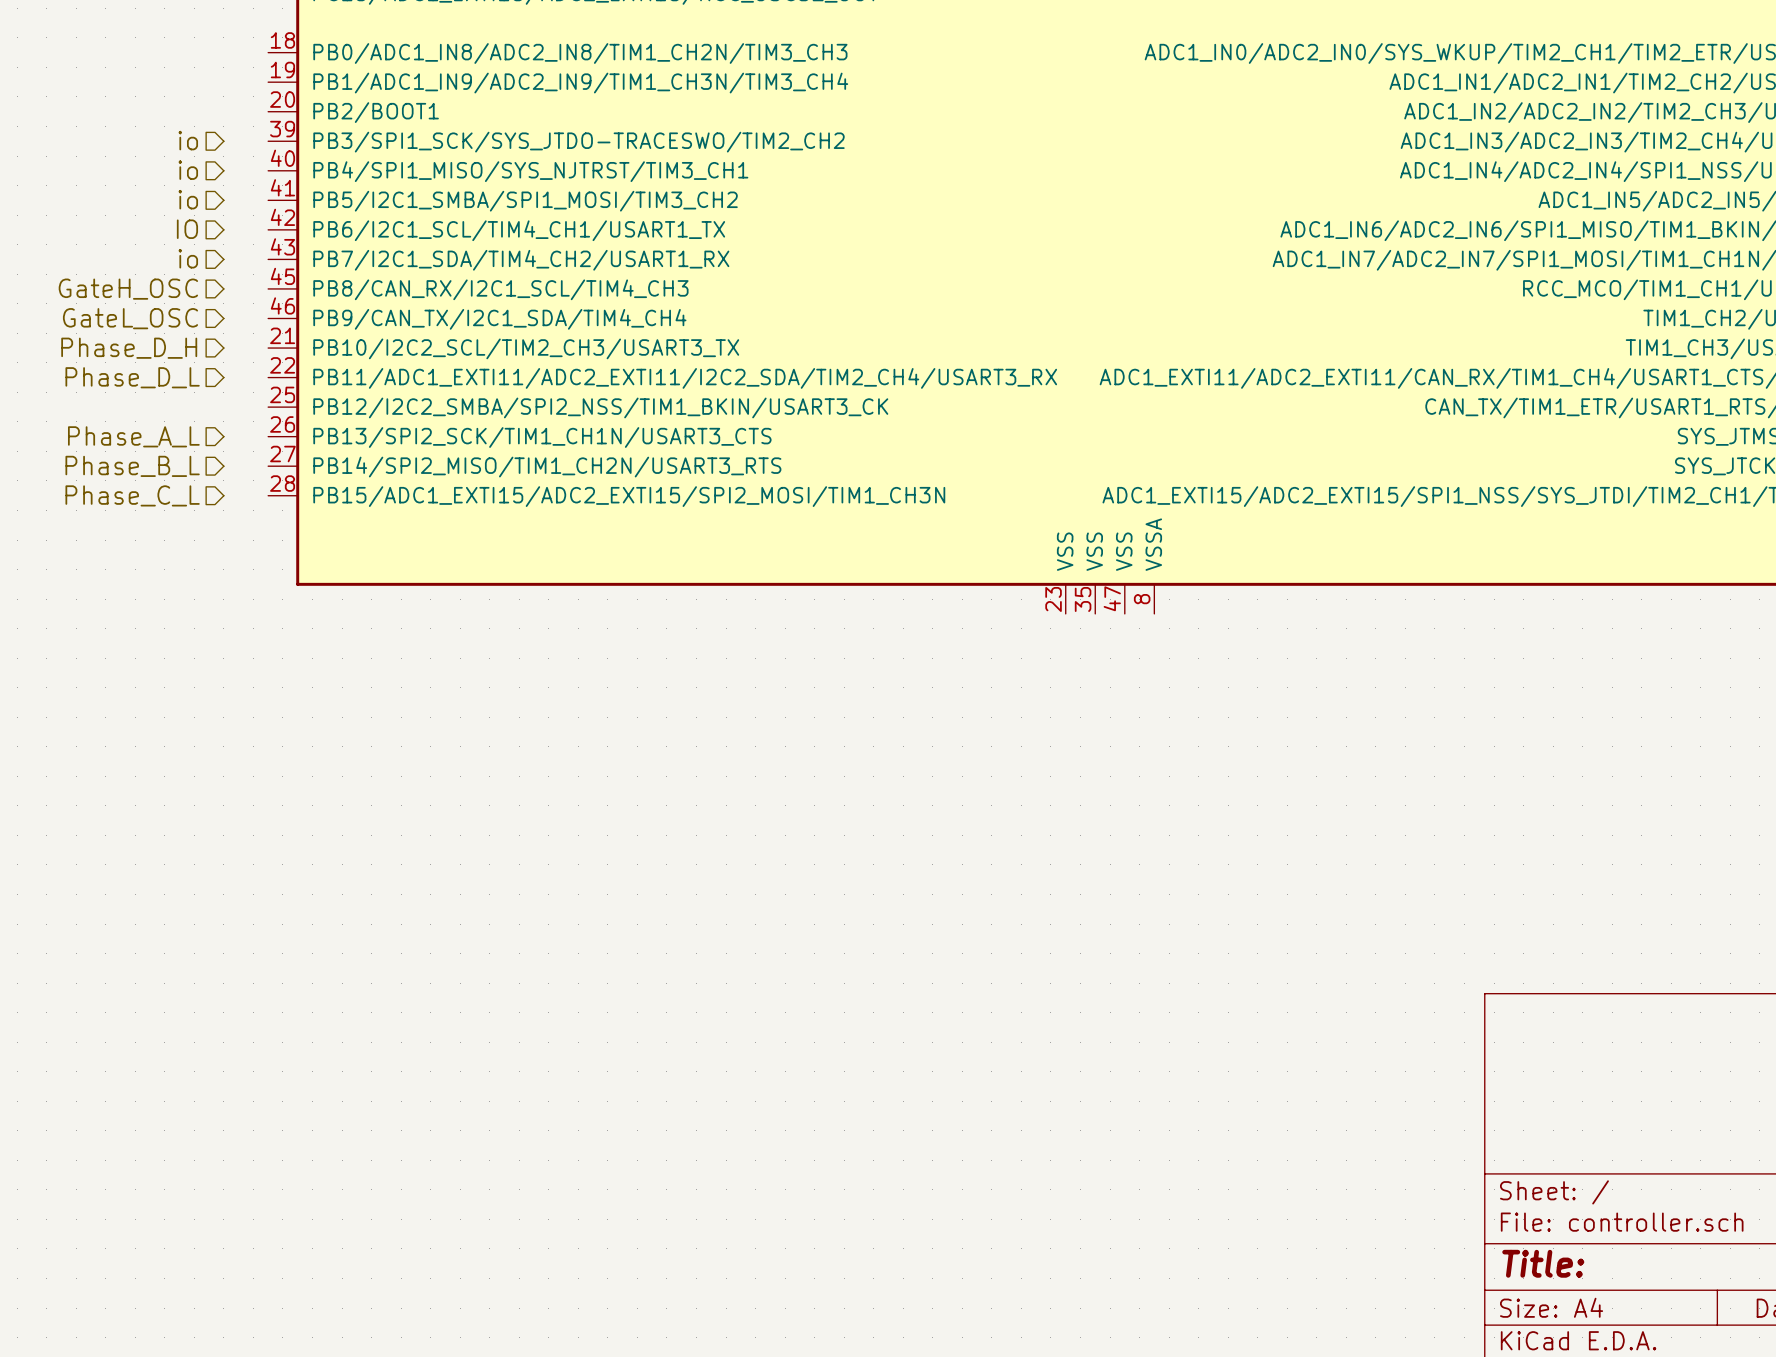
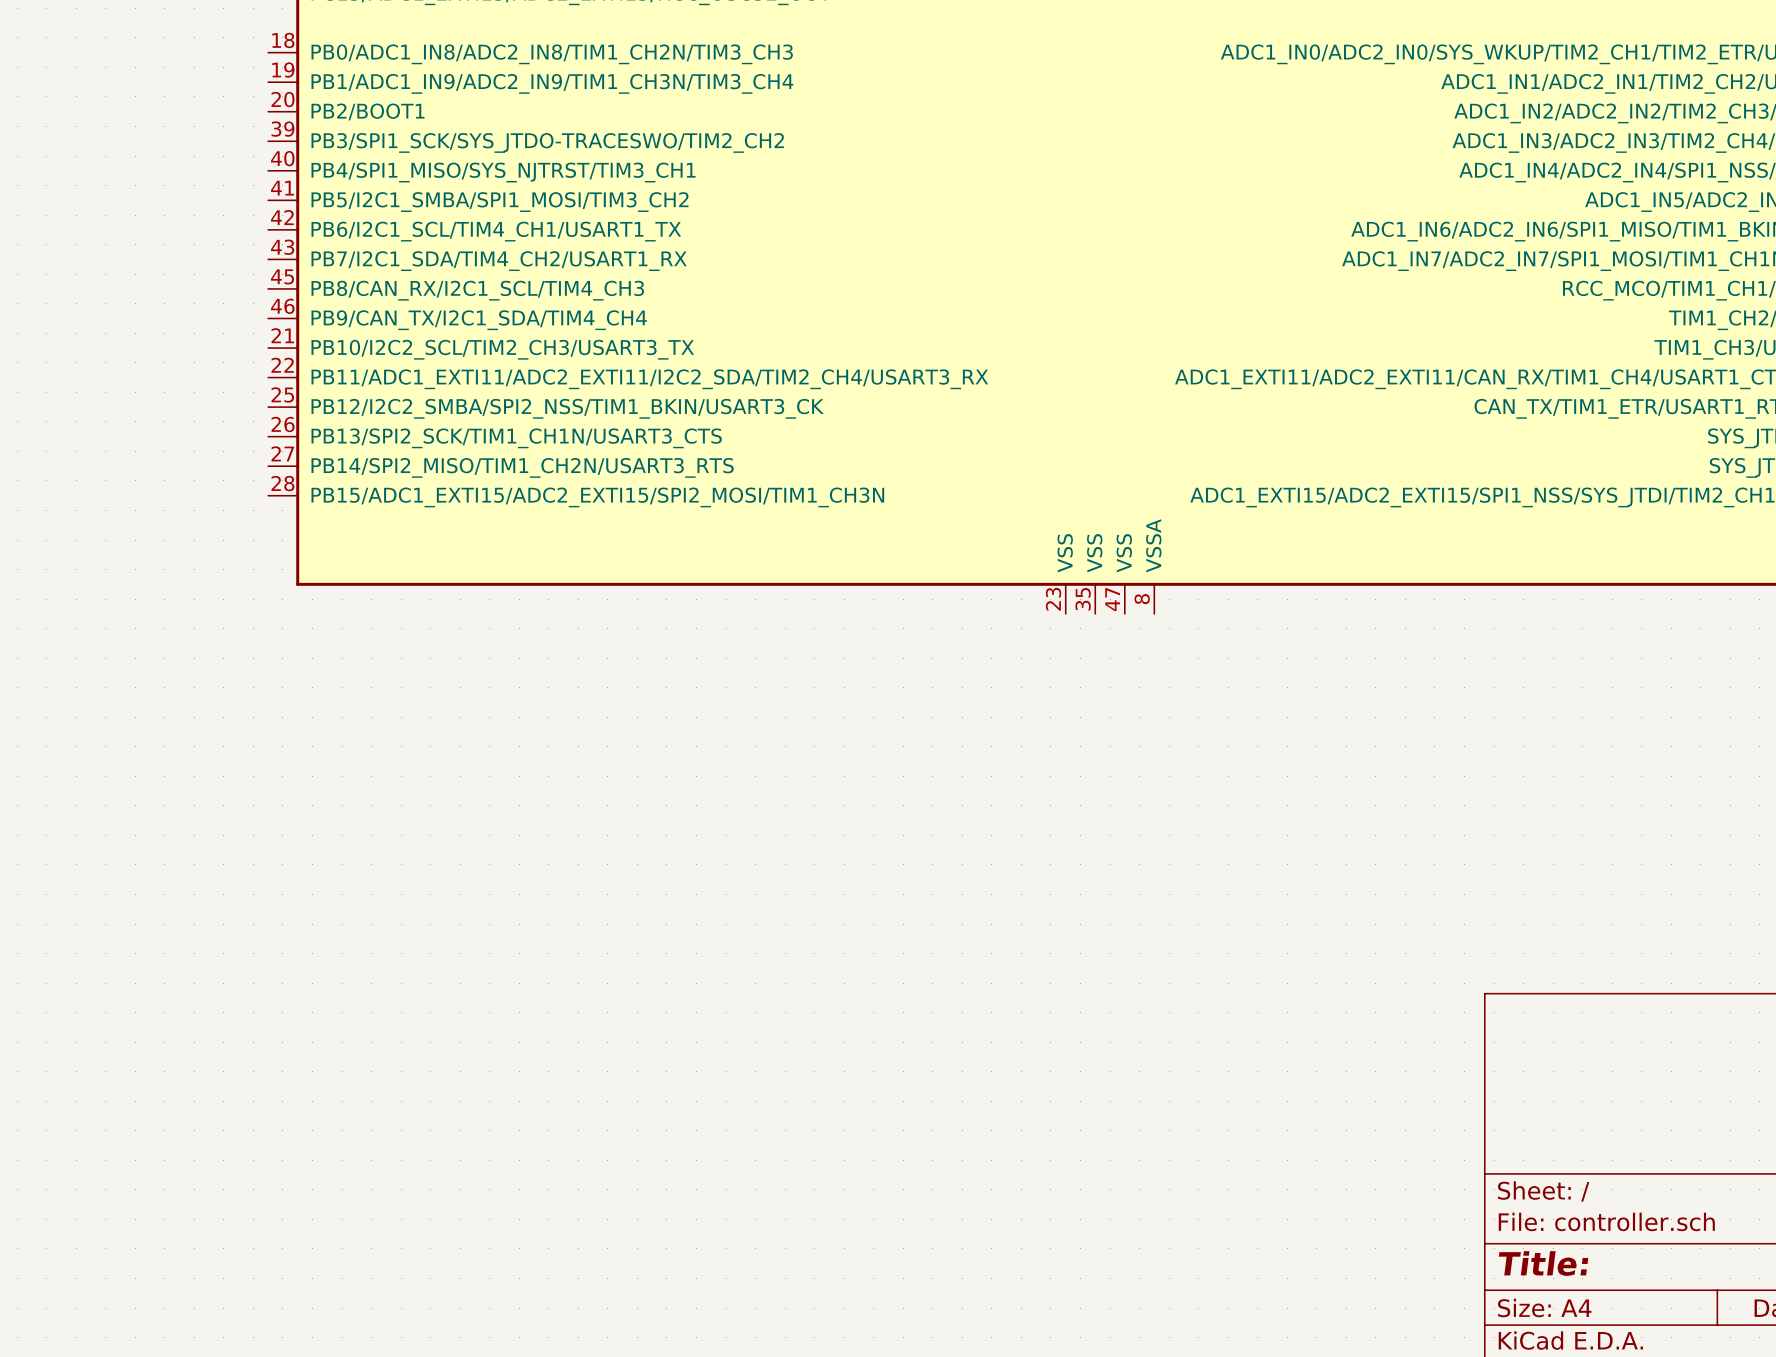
hierarchical label: io (188, 140) -> none
hierarchical label: io (188, 170) -> none
hierarchical label: io (188, 199) -> none
hierarchical label: IO (187, 229) -> none
hierarchical label: io (188, 258) -> none
hierarchical label: GateH_OSC (128, 289) -> none
hierarchical label: GateL_OSC (130, 318) -> none
hierarchical label: Phase_D_H (129, 348) -> none
hierarchical label: Phase_D_L (132, 377) -> none
hierarchical label: Phase_A_L (133, 436) -> none
hierarchical label: Phase_B_L (132, 466) -> none
hierarchical label: Phase_C_L (132, 495) -> none

